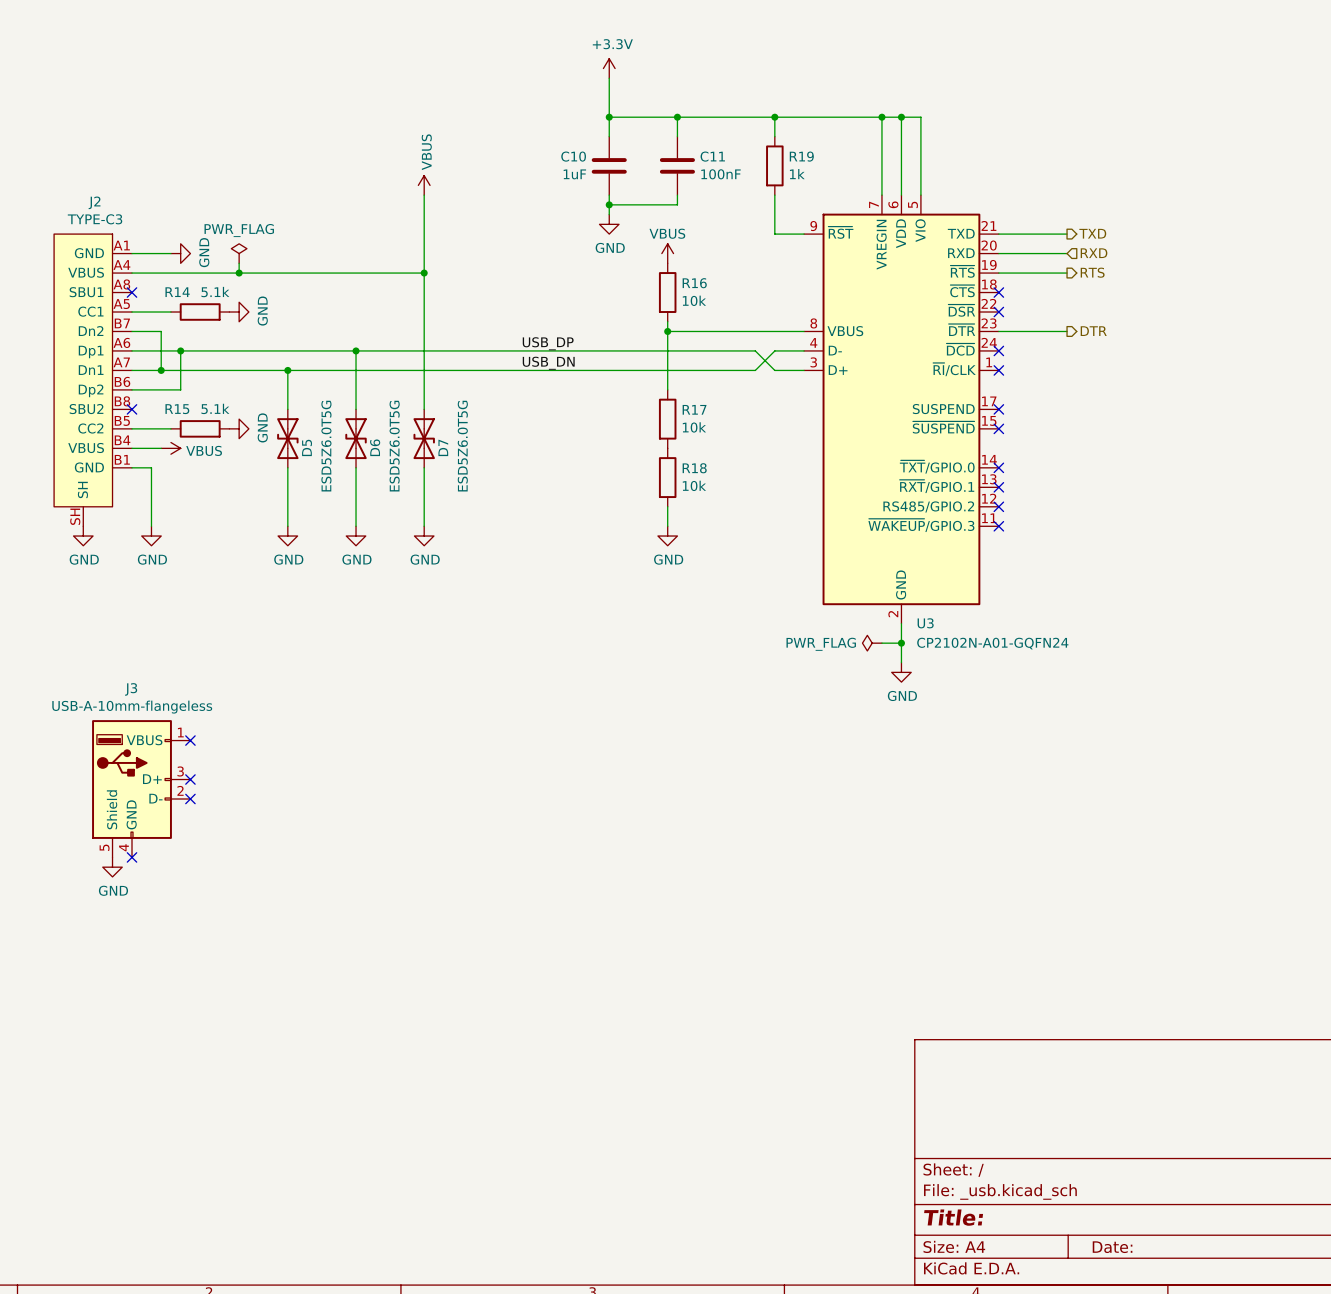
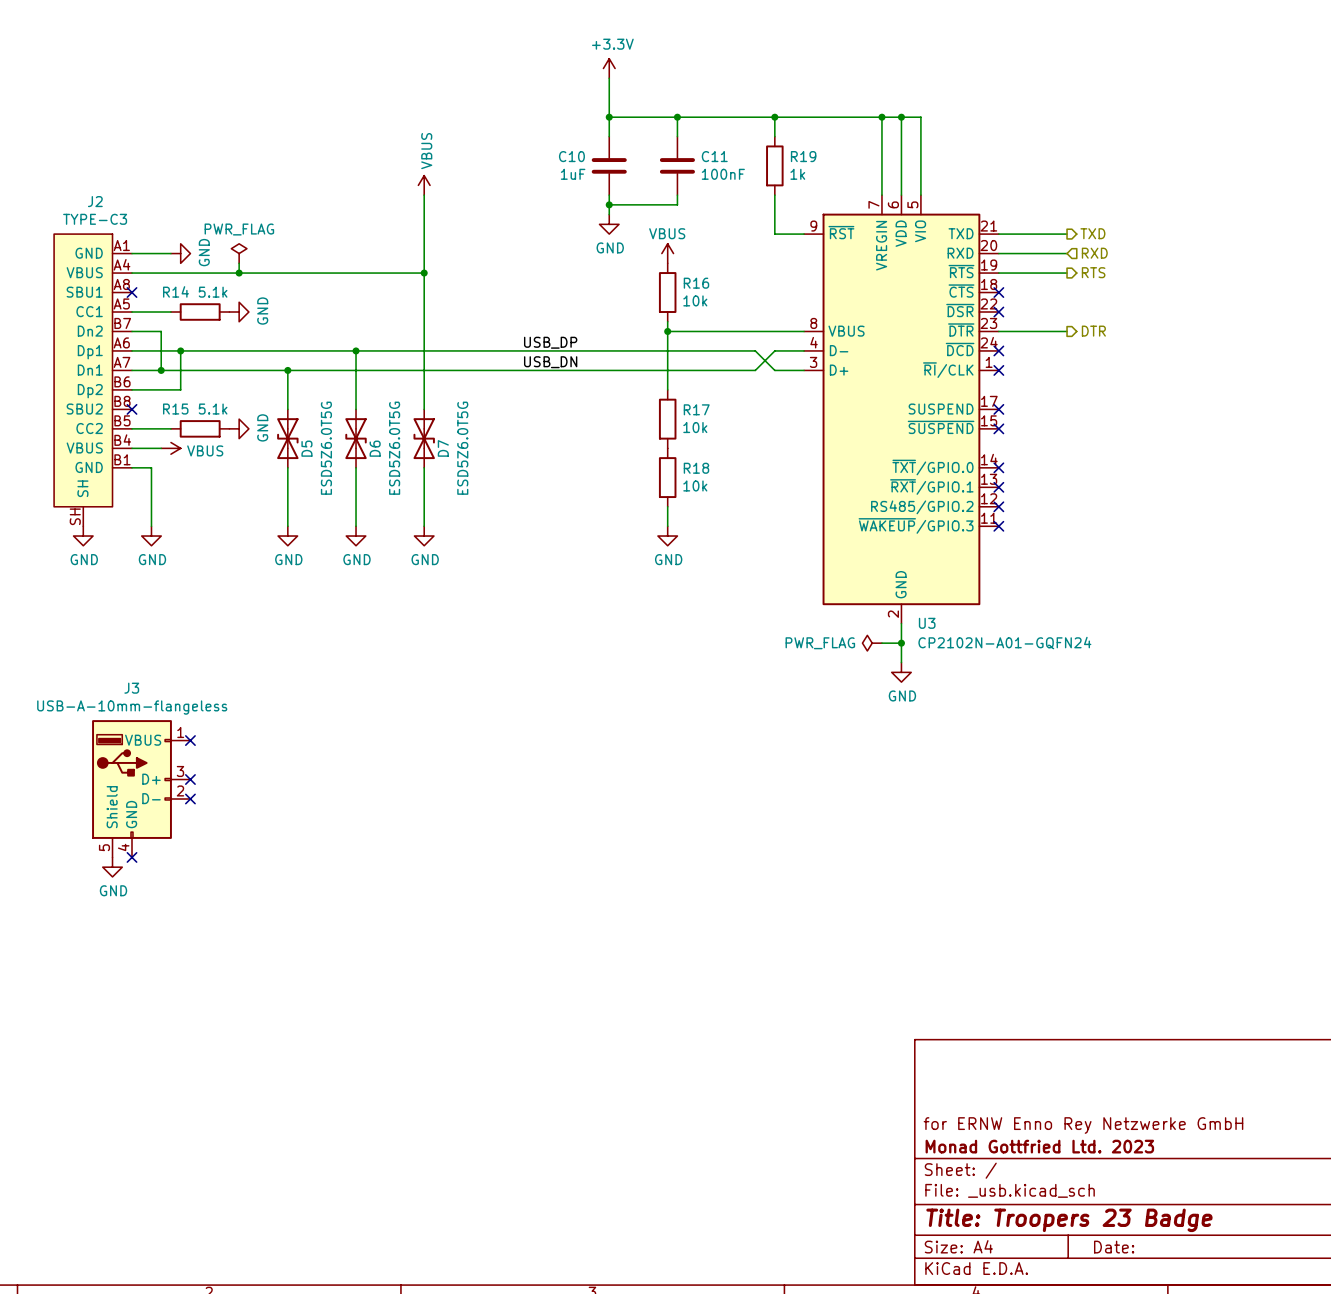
title block: none -> for ERNW Enno Rey Netzwerke GmbH (1083, 1125)
title block: none -> Monad Gottfried Ltd. 2023 (1039, 1146)
title block: Title: (953, 1217) -> Title: Troopers 23 Badge (1069, 1220)

